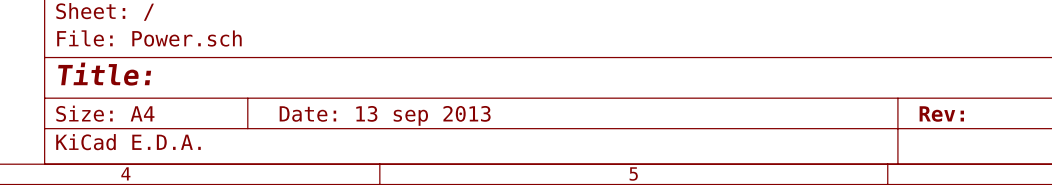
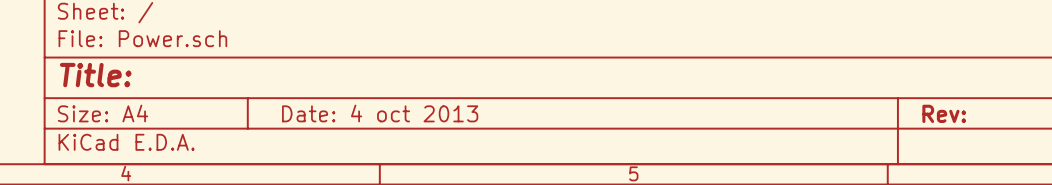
title block: Date: 13 sep 2013 (385, 115) -> Date: 4 oct 2013 (380, 113)

